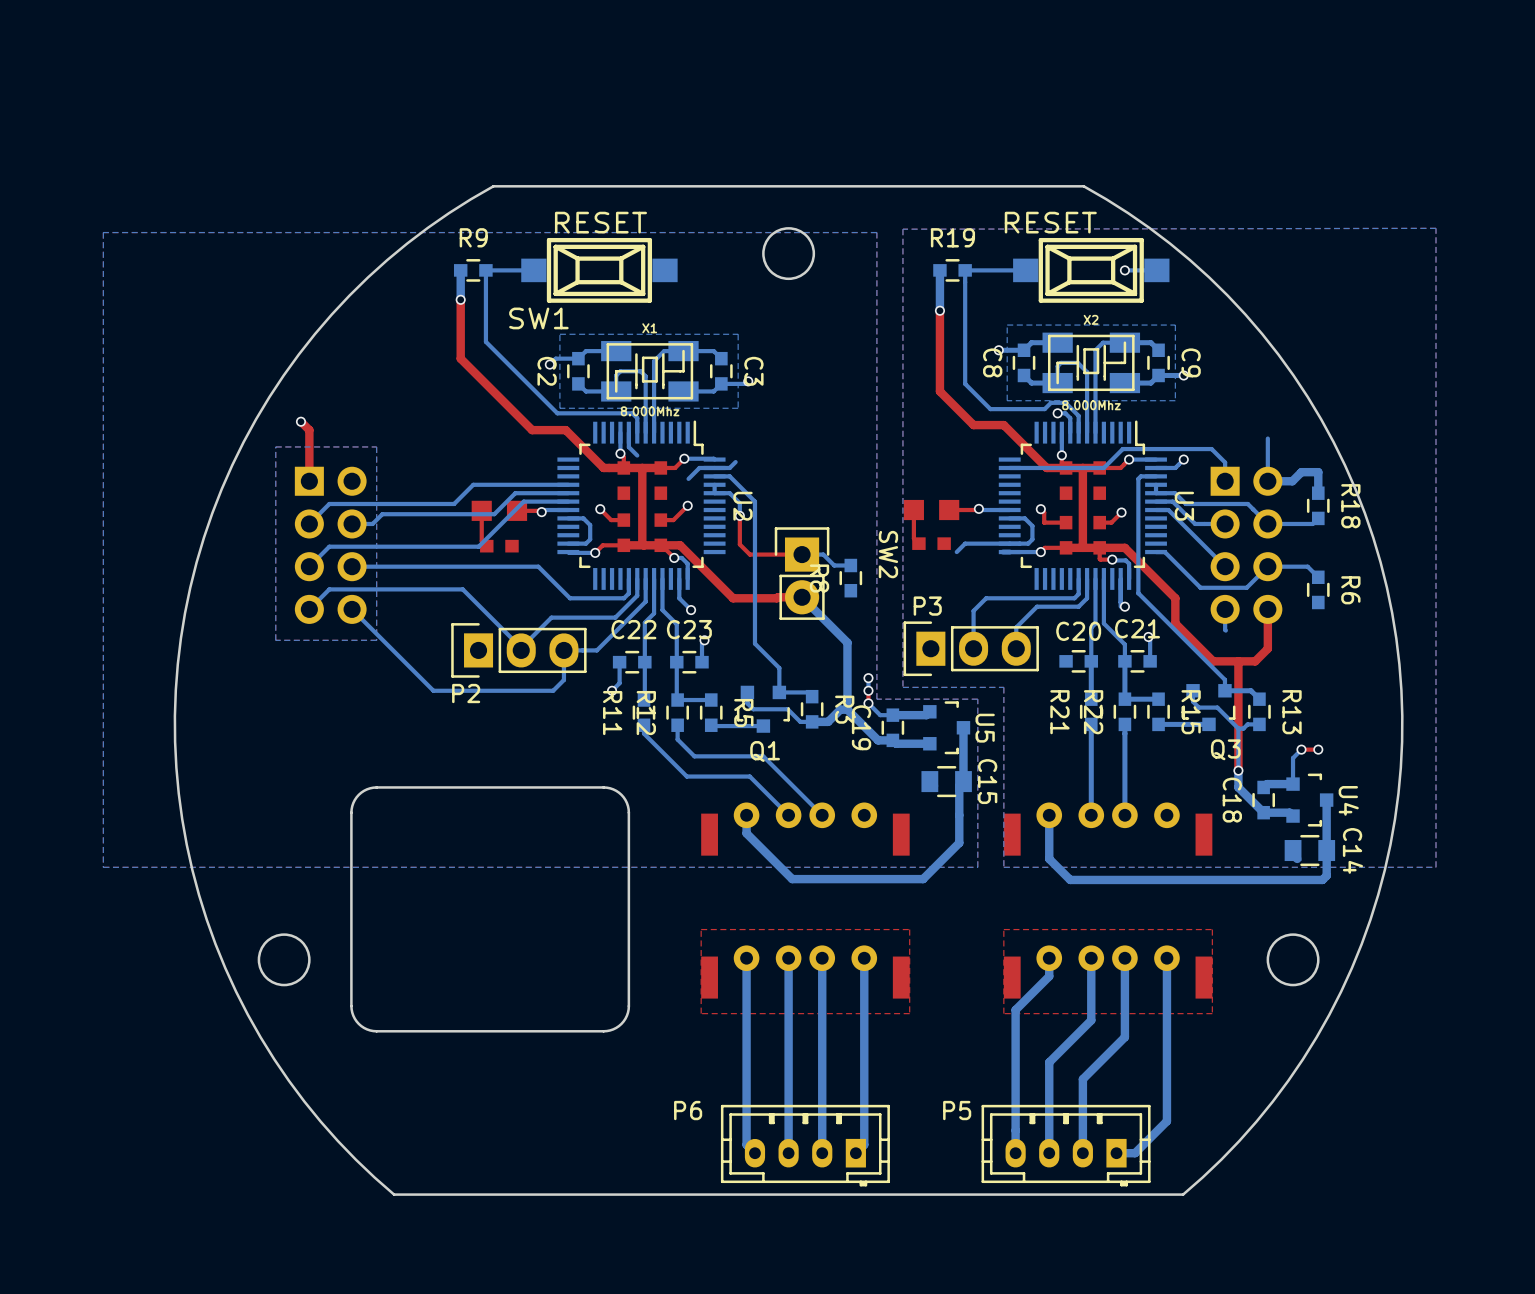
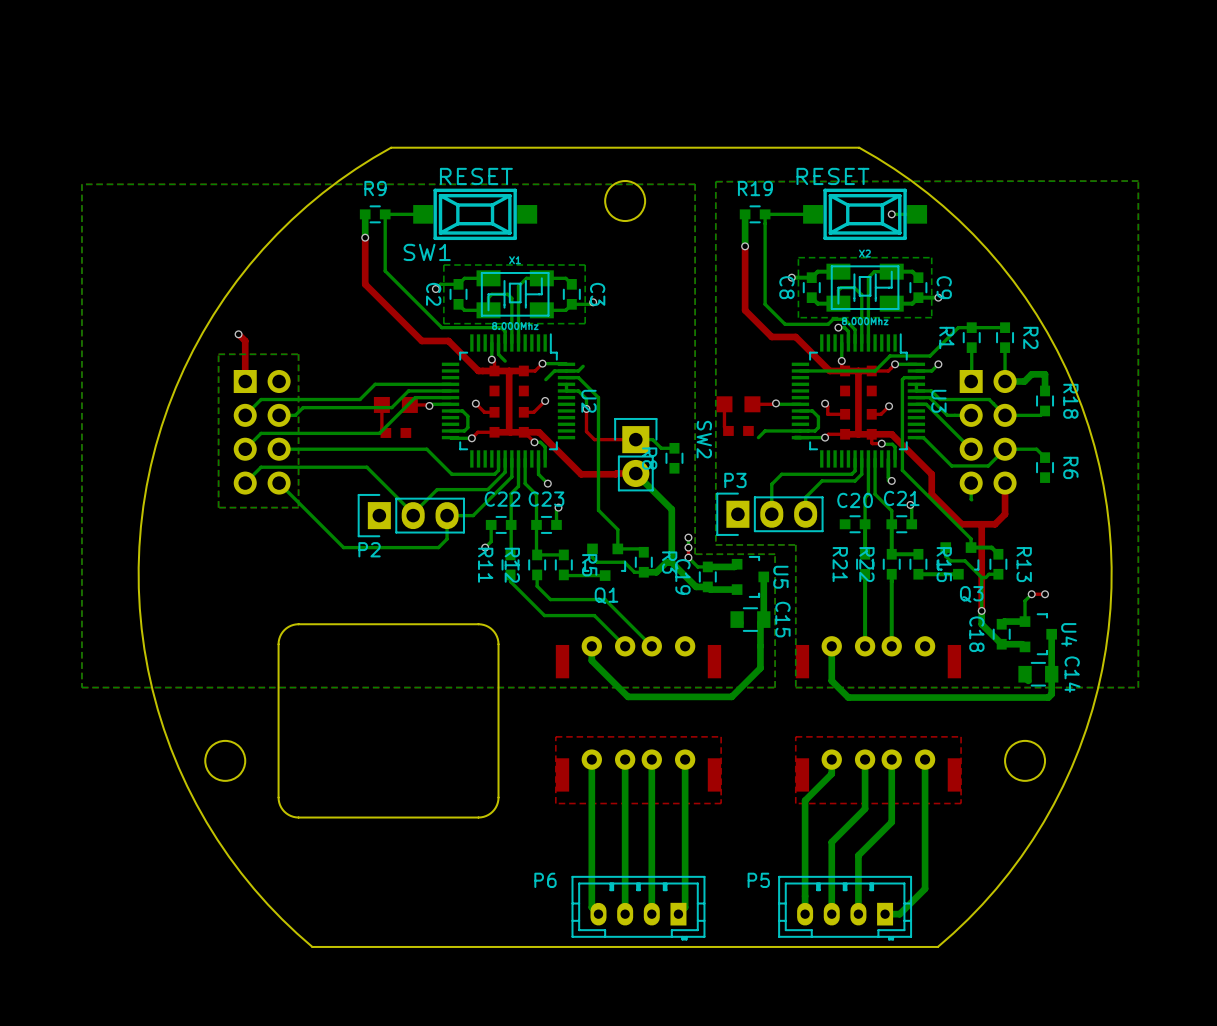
R1: none -> (971, 337)
R2: none -> (1005, 337)
bottom track: none -> (971, 347) (971, 380)
bottom track: (1173, 449) (1211, 449) (1225, 462) (1225, 481) -> (930, 355) (958, 327) (1005, 327)

